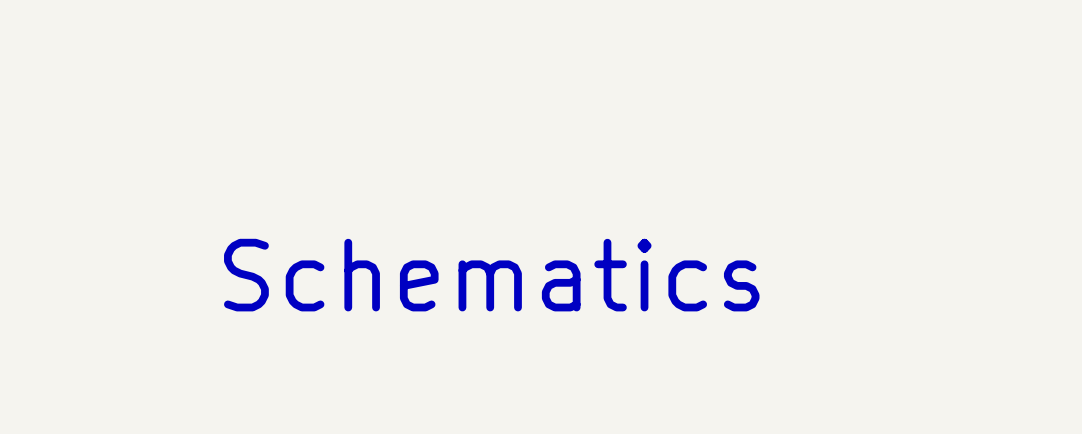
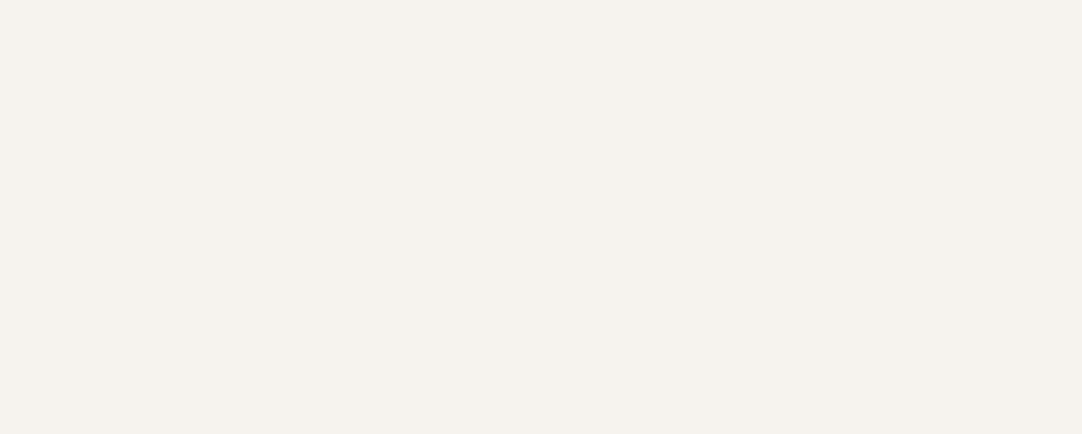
text: Schematics (491, 275) -> none

